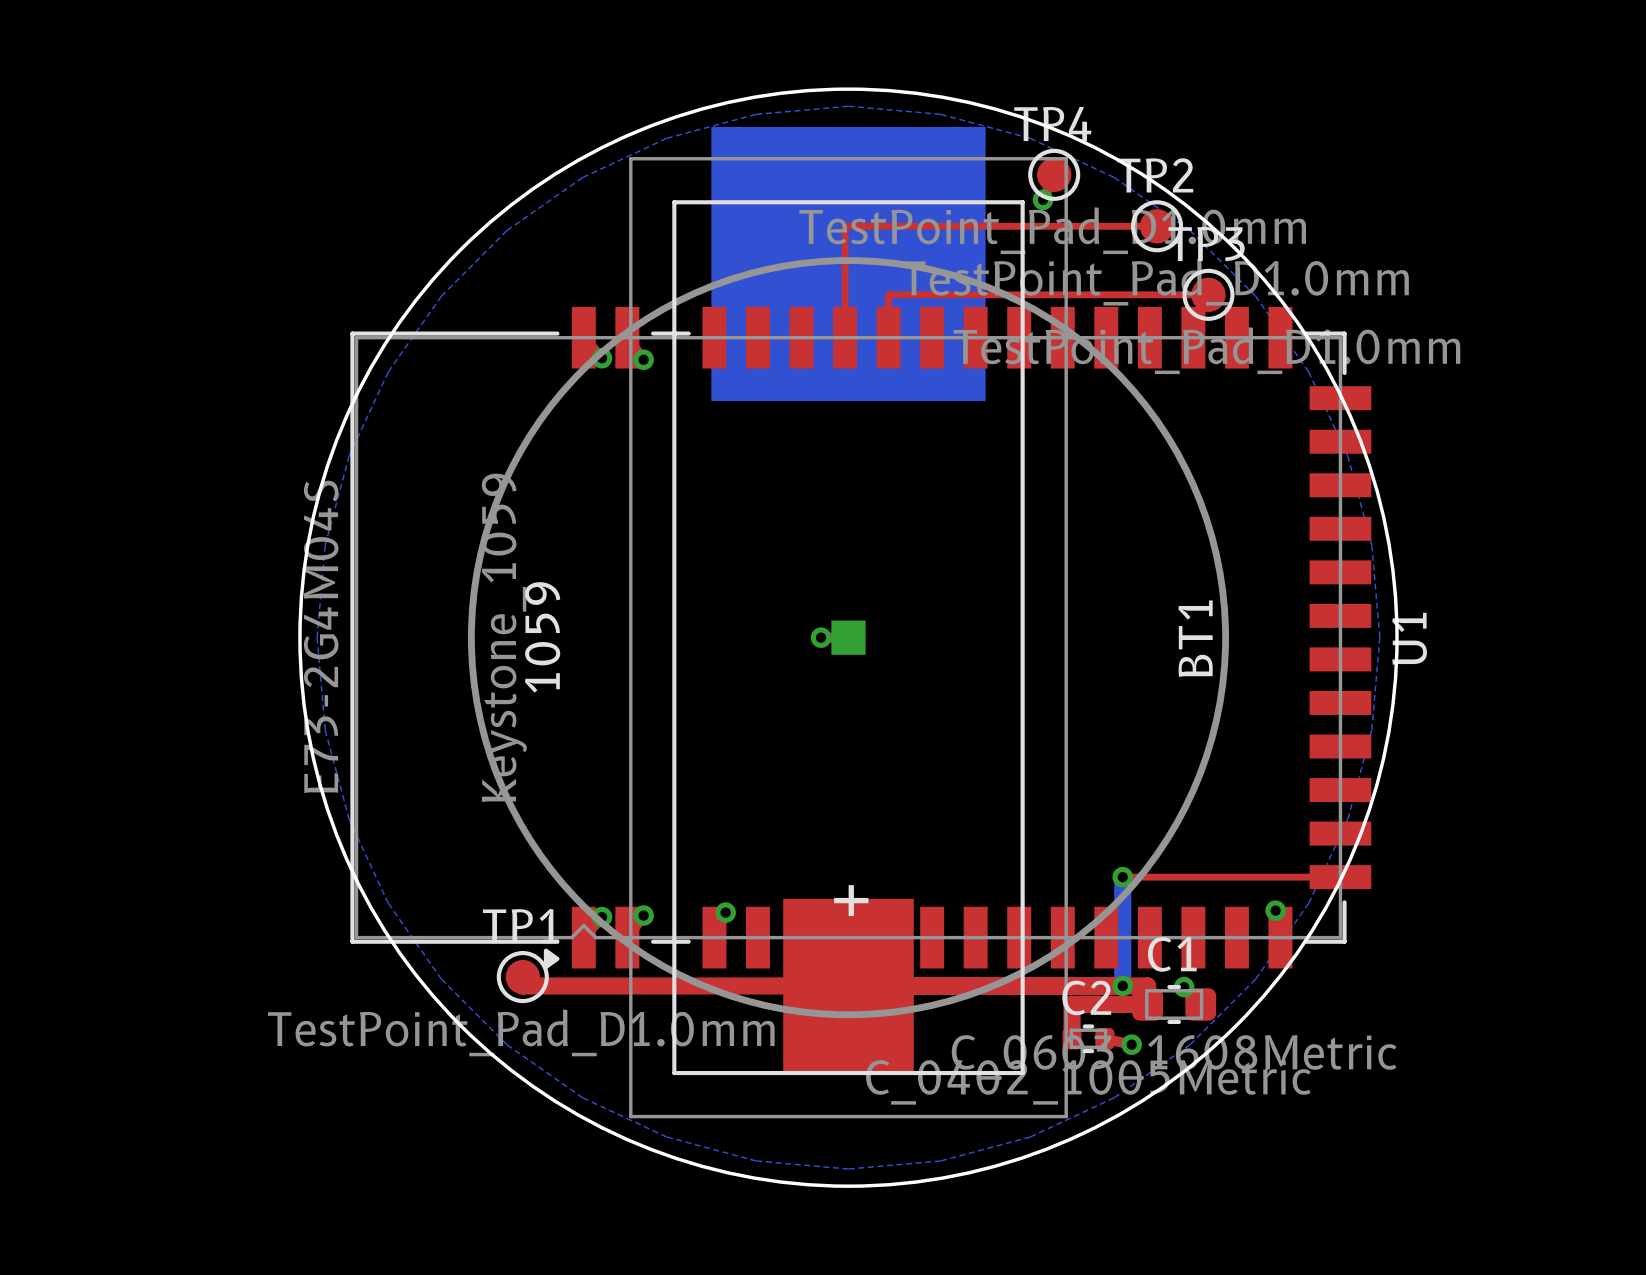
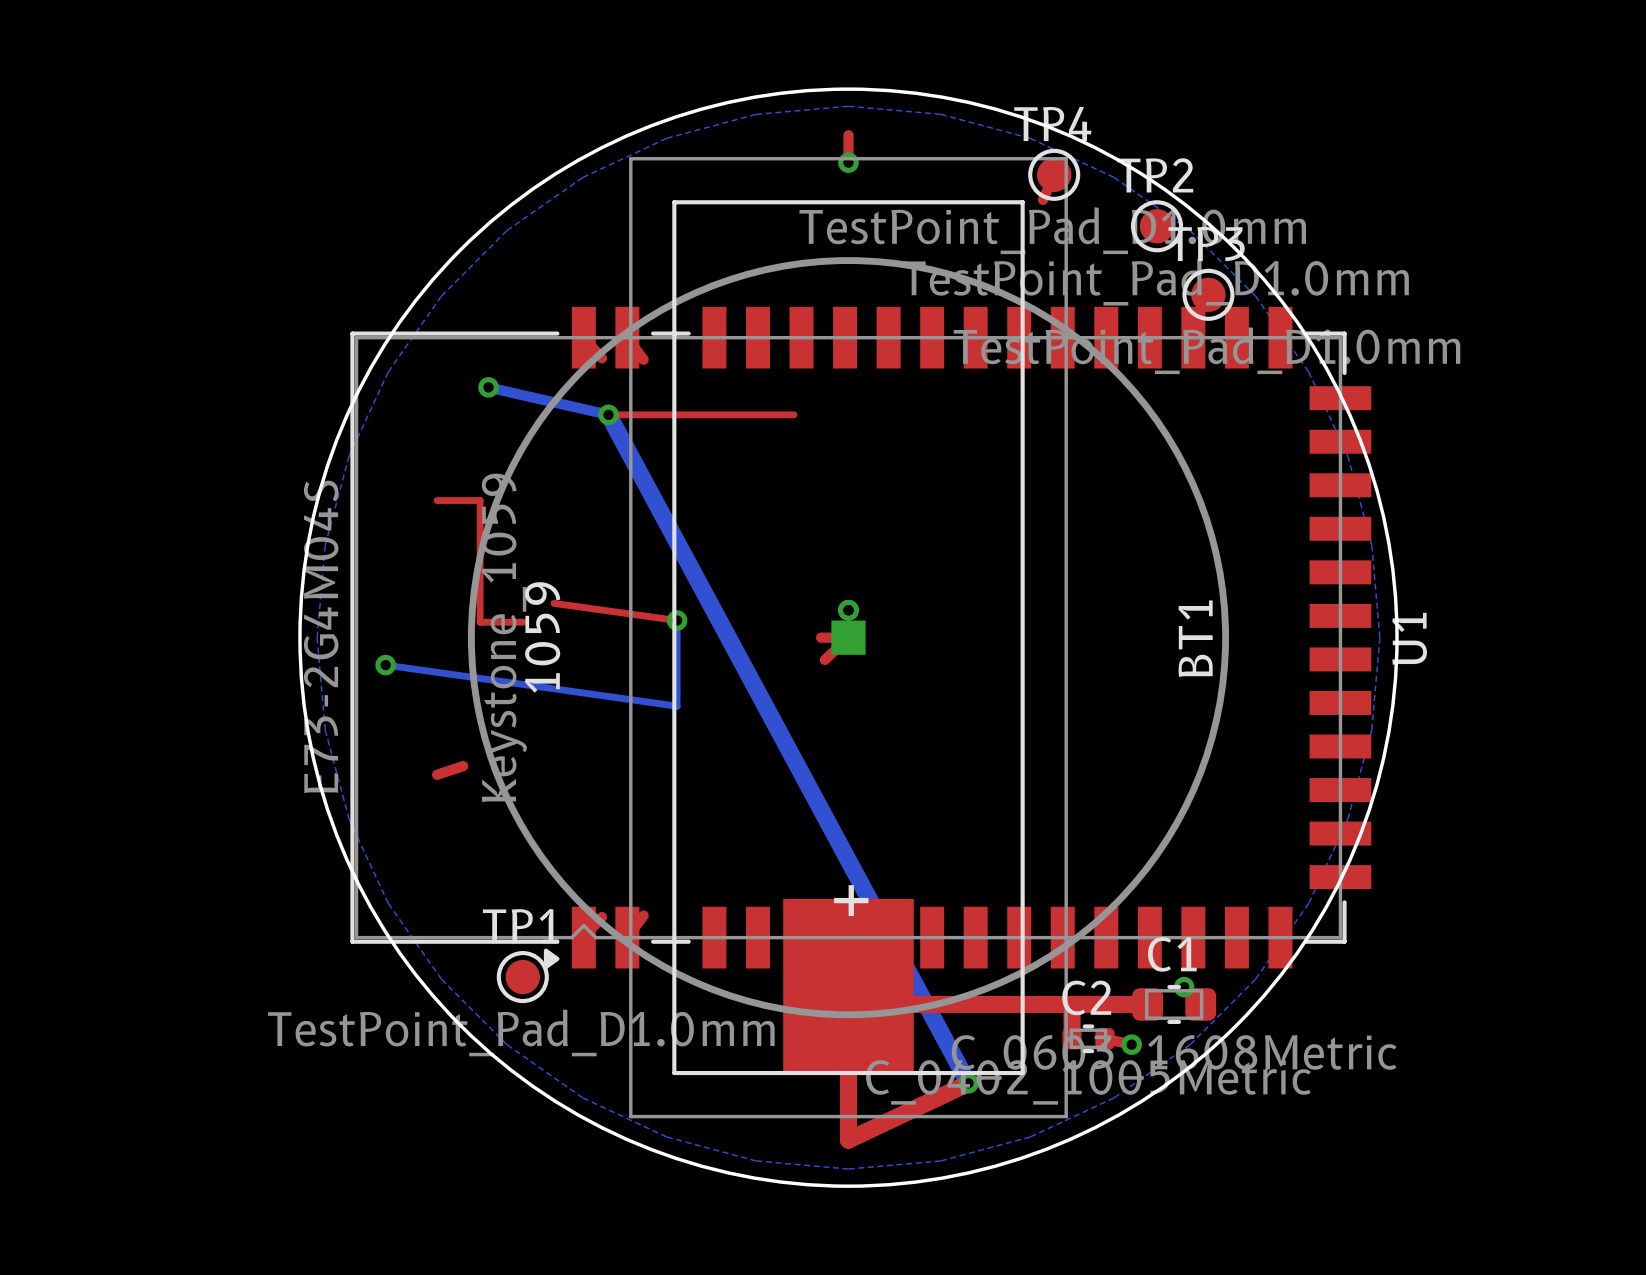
top track: none -> (848, 135) (848, 162)
via: none -> (848, 162)
via: (1043, 199) -> none
top track: (1157, 226) (845, 226) (845, 337) -> none
part: (848, 263) -> none
top track: (1208, 294) (888, 294) (888, 337) -> none
via: (601, 358) -> none
via: (643, 359) -> none
bottom track: none -> (488, 387) (608, 414) (968, 1083)
via: none -> (488, 387)
top track: none -> (608, 414) (793, 414)
via: none -> (608, 414)
top track: none -> (437, 500) (480, 500) (480, 622) (523, 622)
top track: none -> (554, 603) (677, 620)
bottom track: none -> (677, 620) (677, 706) (385, 665)
via: none -> (677, 620)
via position: (821, 637) -> (848, 610)
top track: none -> (844, 641) (824, 659)
via: none -> (385, 665)
top track: none -> (463, 766) (437, 774)
top track: (1122, 877) (1330, 877) -> none
bottom track: (1122, 877) (1122, 985) -> none
via: (1122, 877) -> none
via: (1275, 910) -> none
via: (725, 912) -> none
via: (643, 915) -> none
via: (601, 917) -> none
top track: (522, 977) (522, 985) (1147, 985) (1147, 1004) -> none
via: (1122, 985) -> none
top track: none -> (1072, 1004) (848, 1004) (848, 1140) (968, 1083)
via: none -> (968, 1083)

